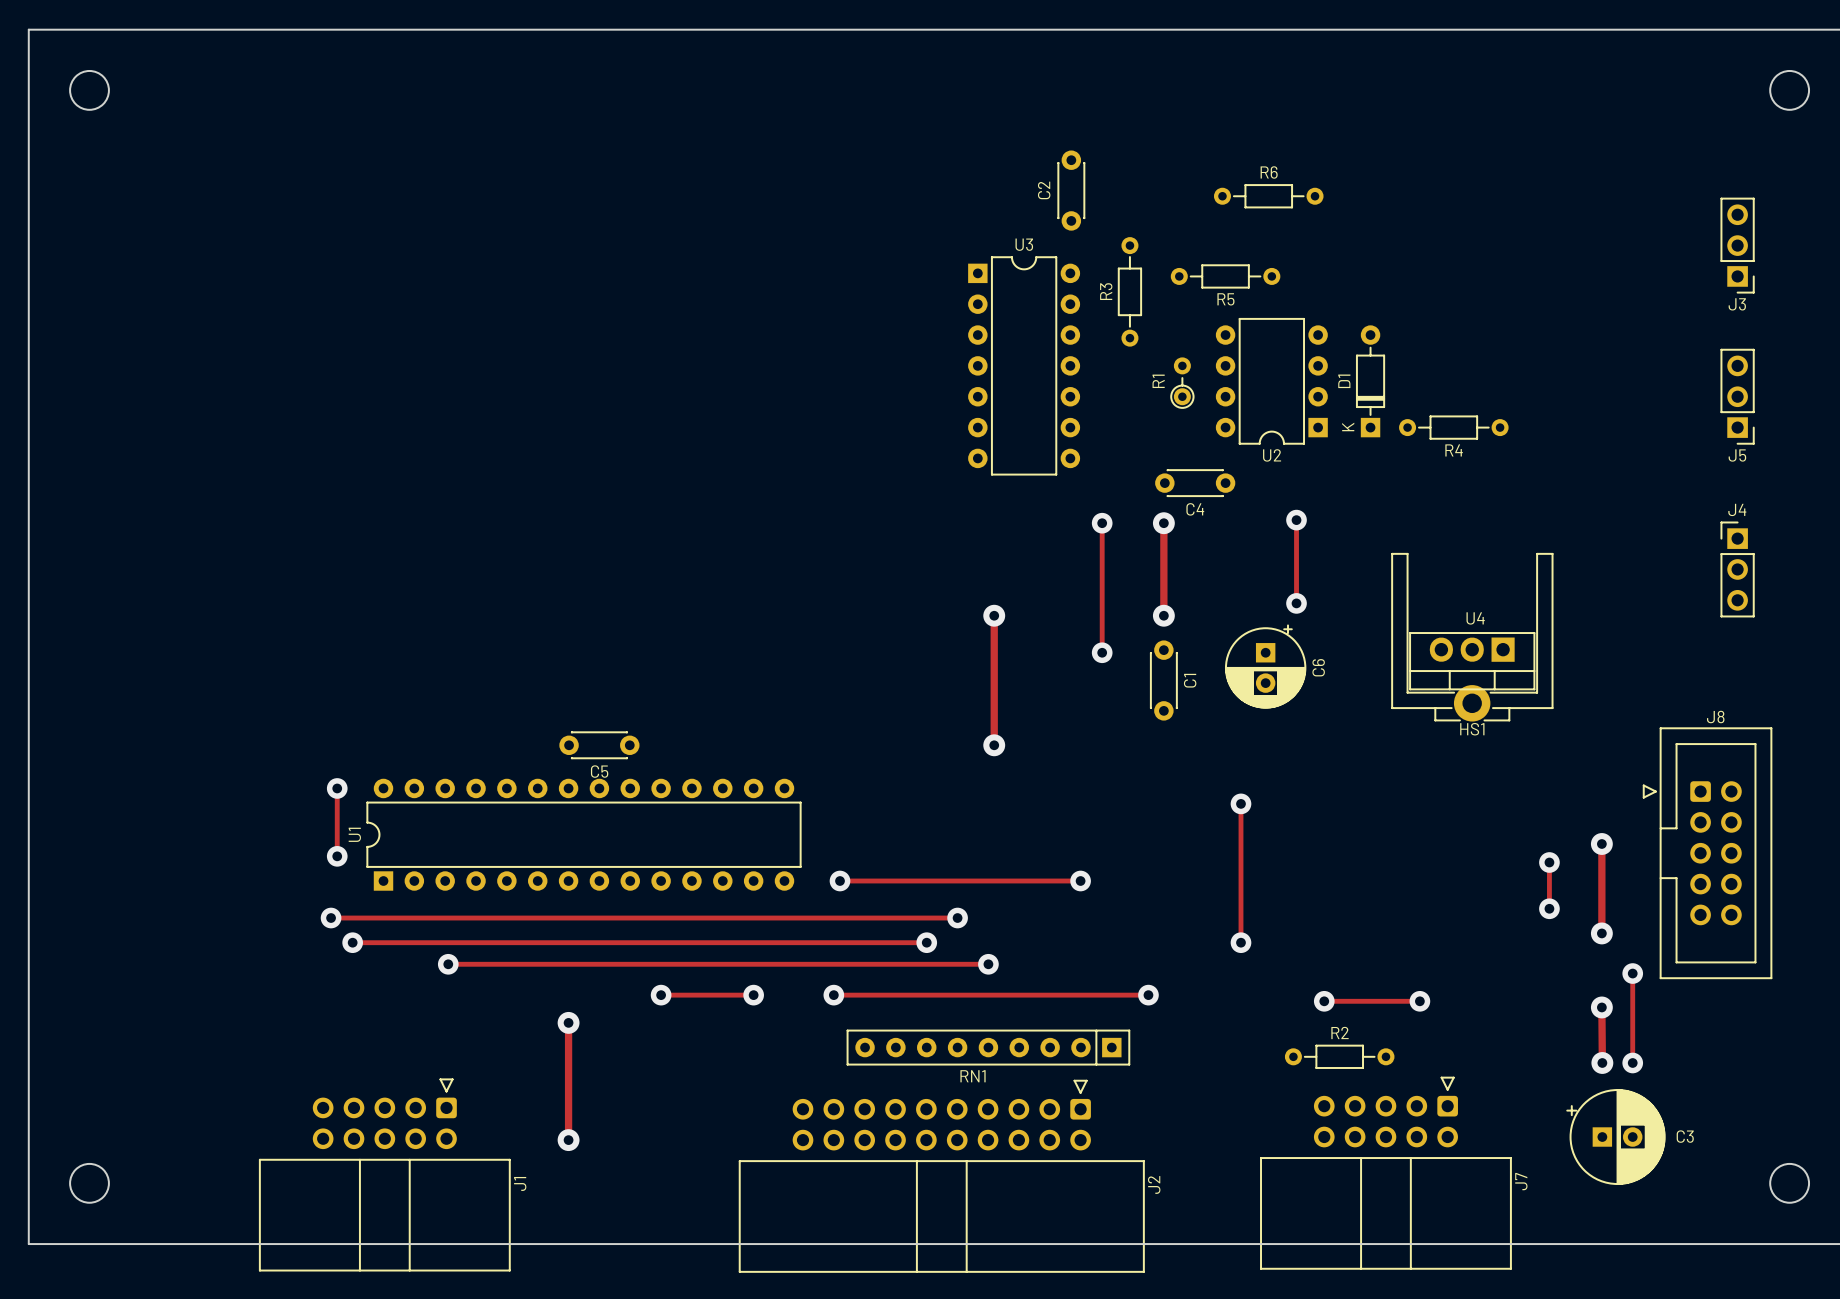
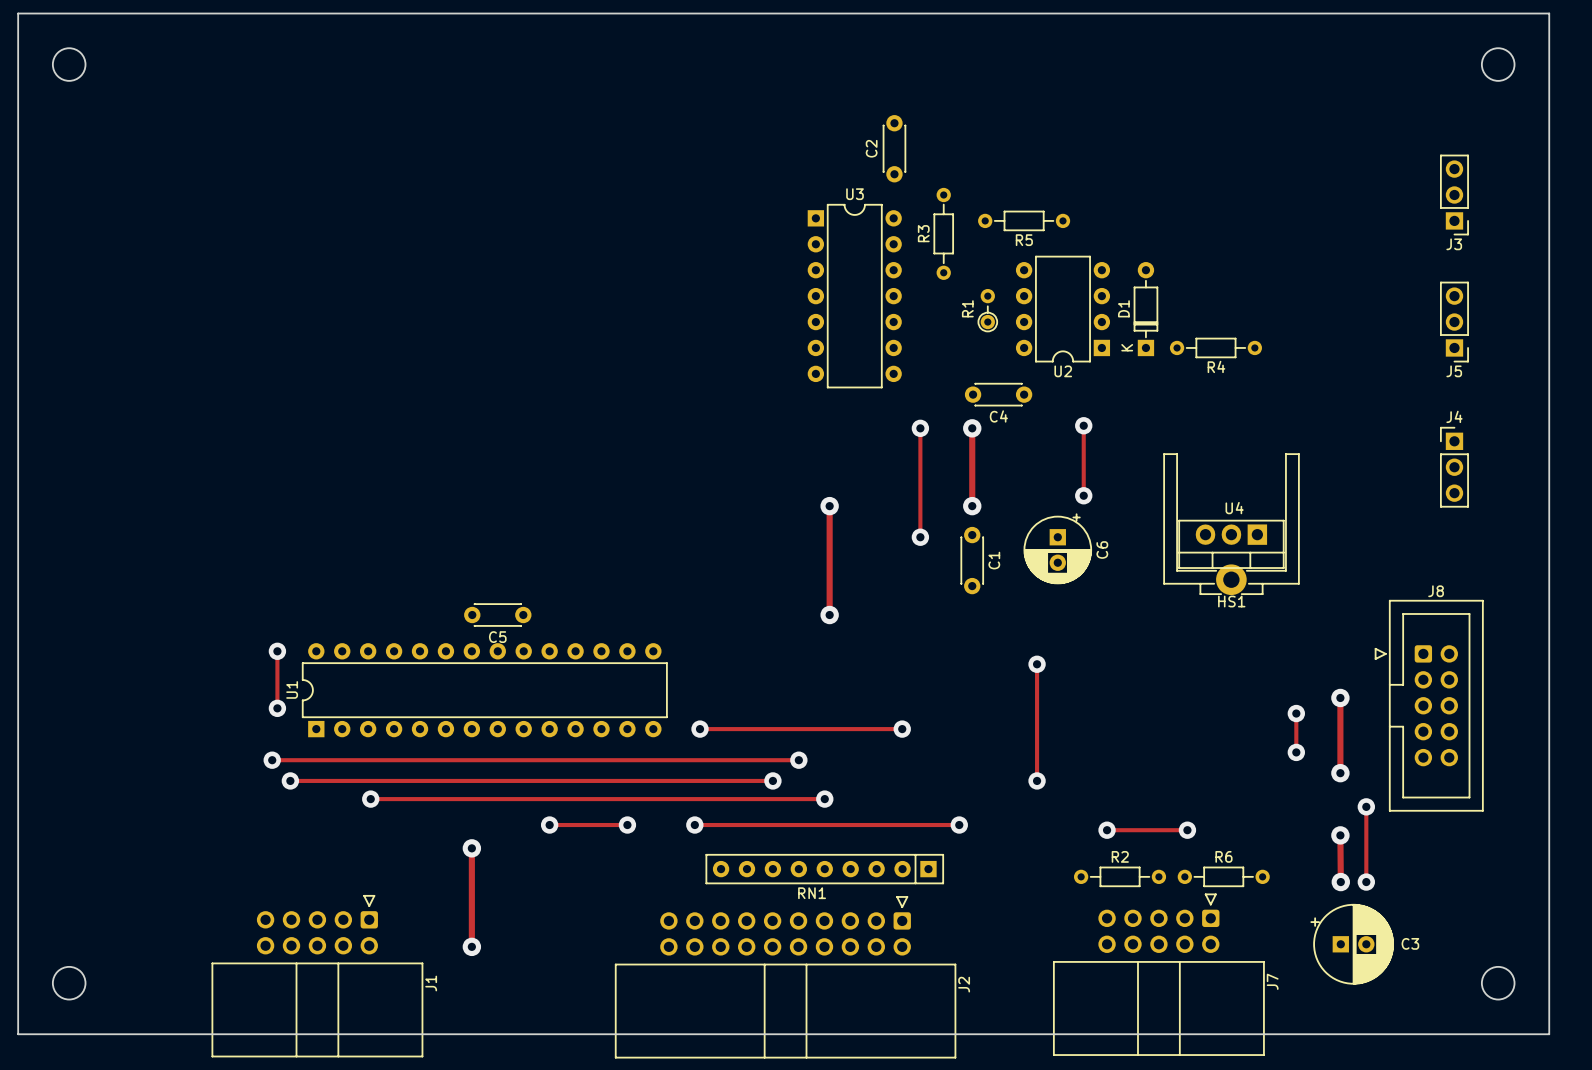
R6 position: (1268, 196) -> (1223, 876)

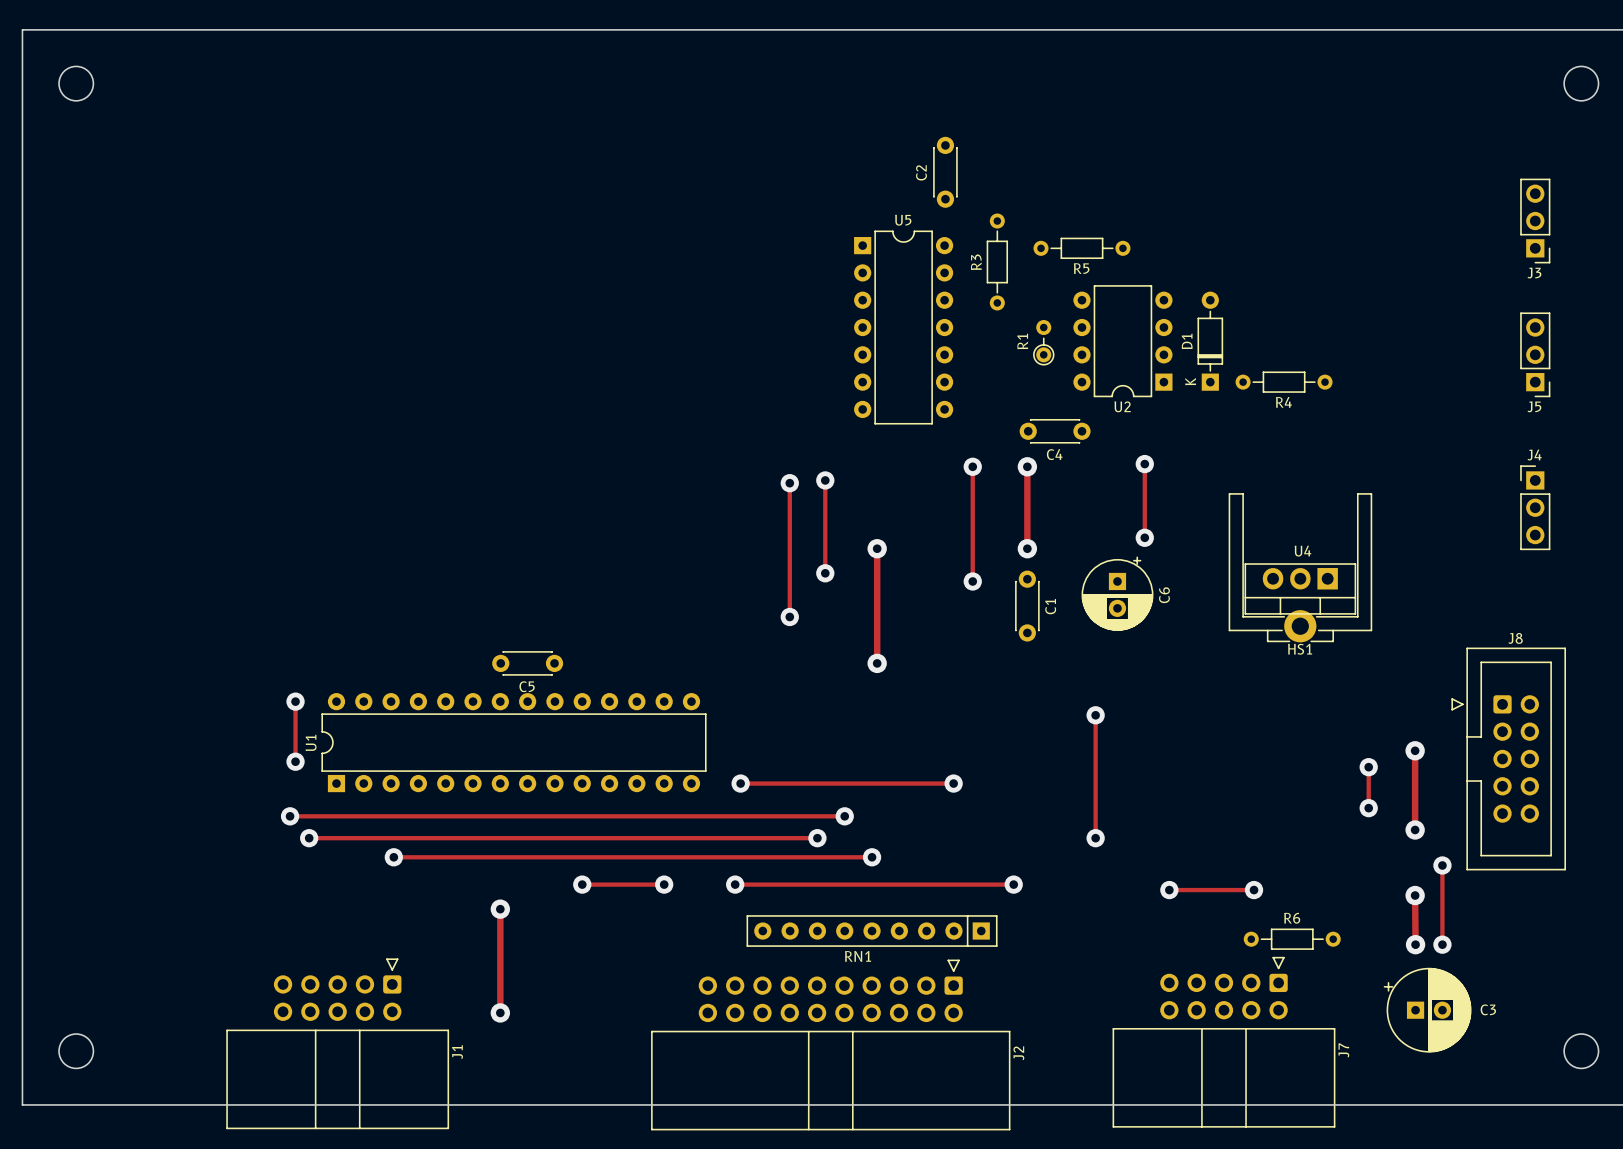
U3 name: U3 (855, 194) -> U5 (903, 220)
track: none -> (825, 480) (825, 573)
via: none -> (825, 480)
track: none -> (789, 483) (789, 616)
via: none -> (789, 483)
via: none -> (825, 573)
via: none -> (789, 616)
R2: (1120, 876) -> none

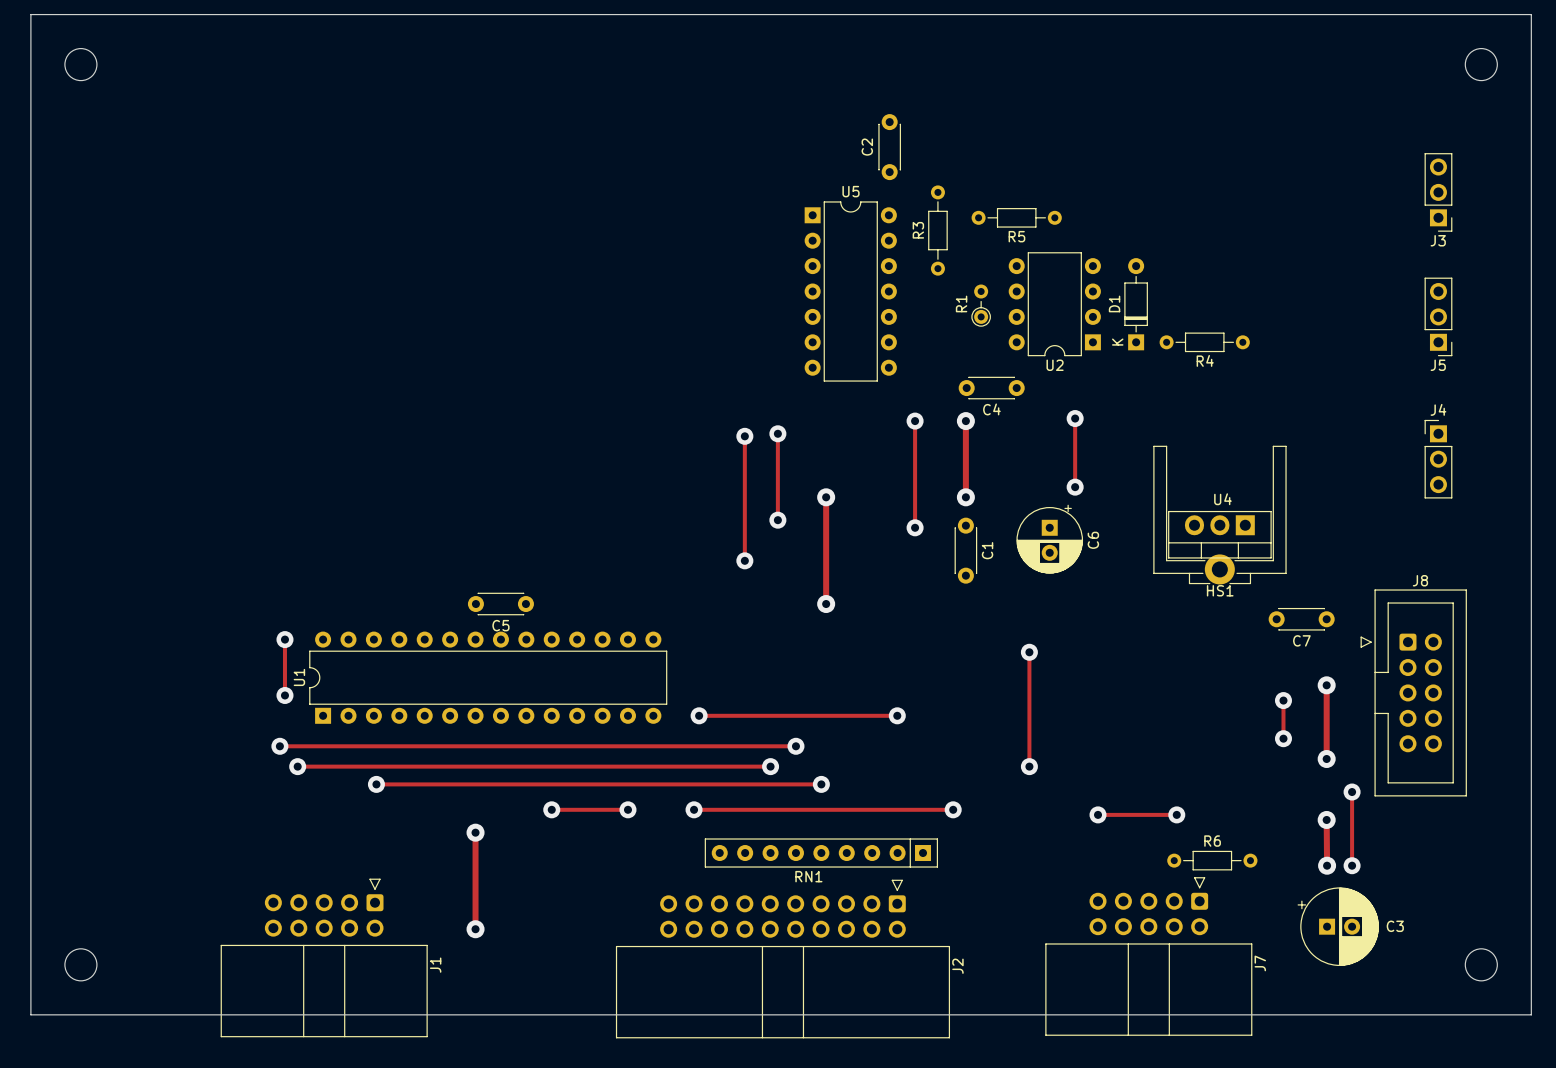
C7: none -> (1301, 619)

